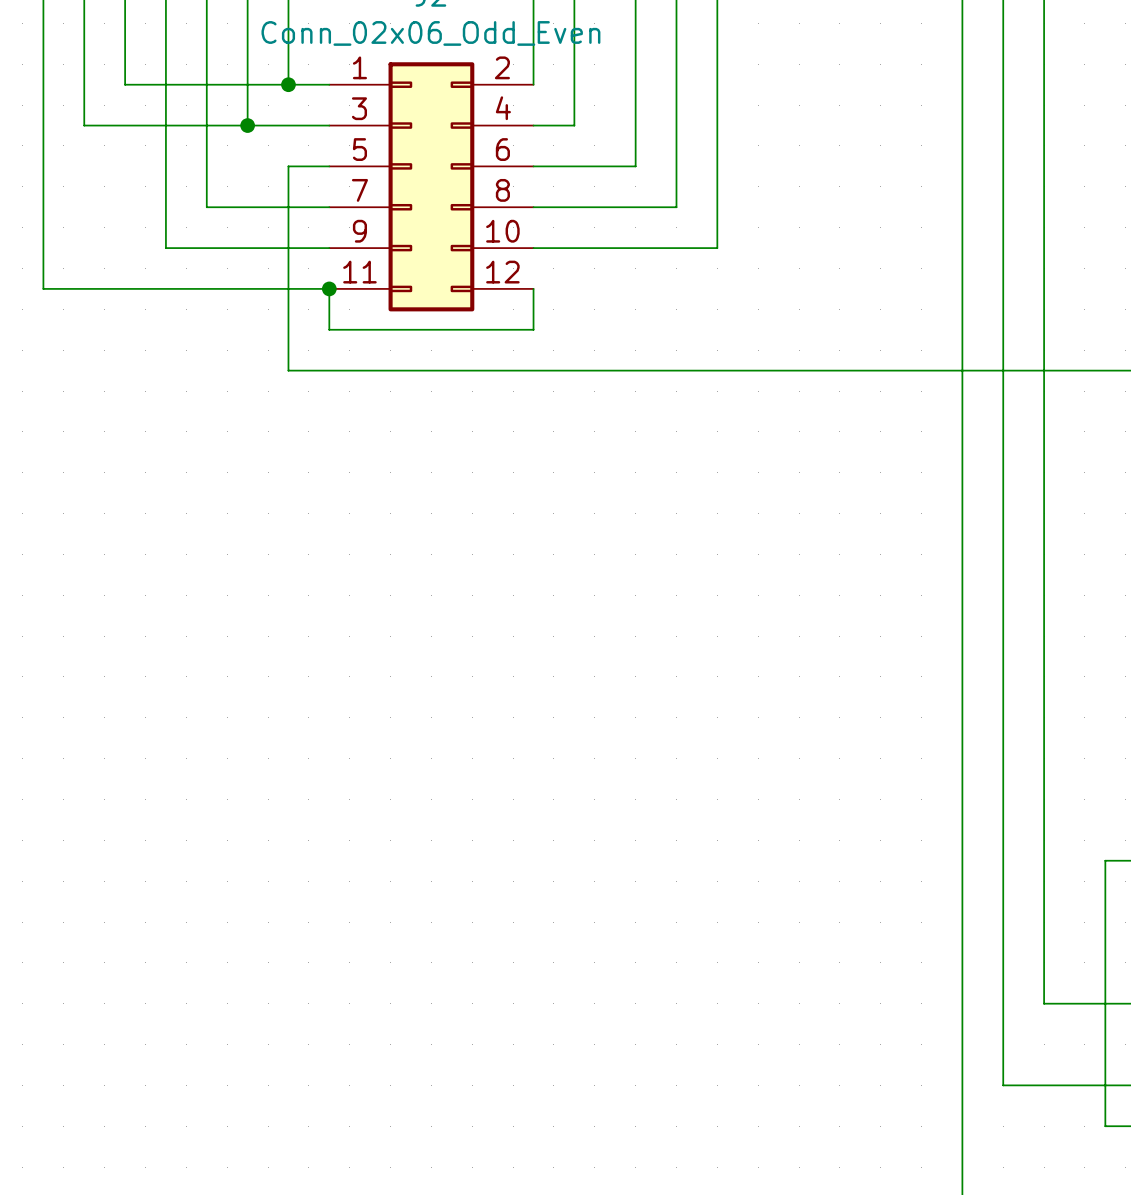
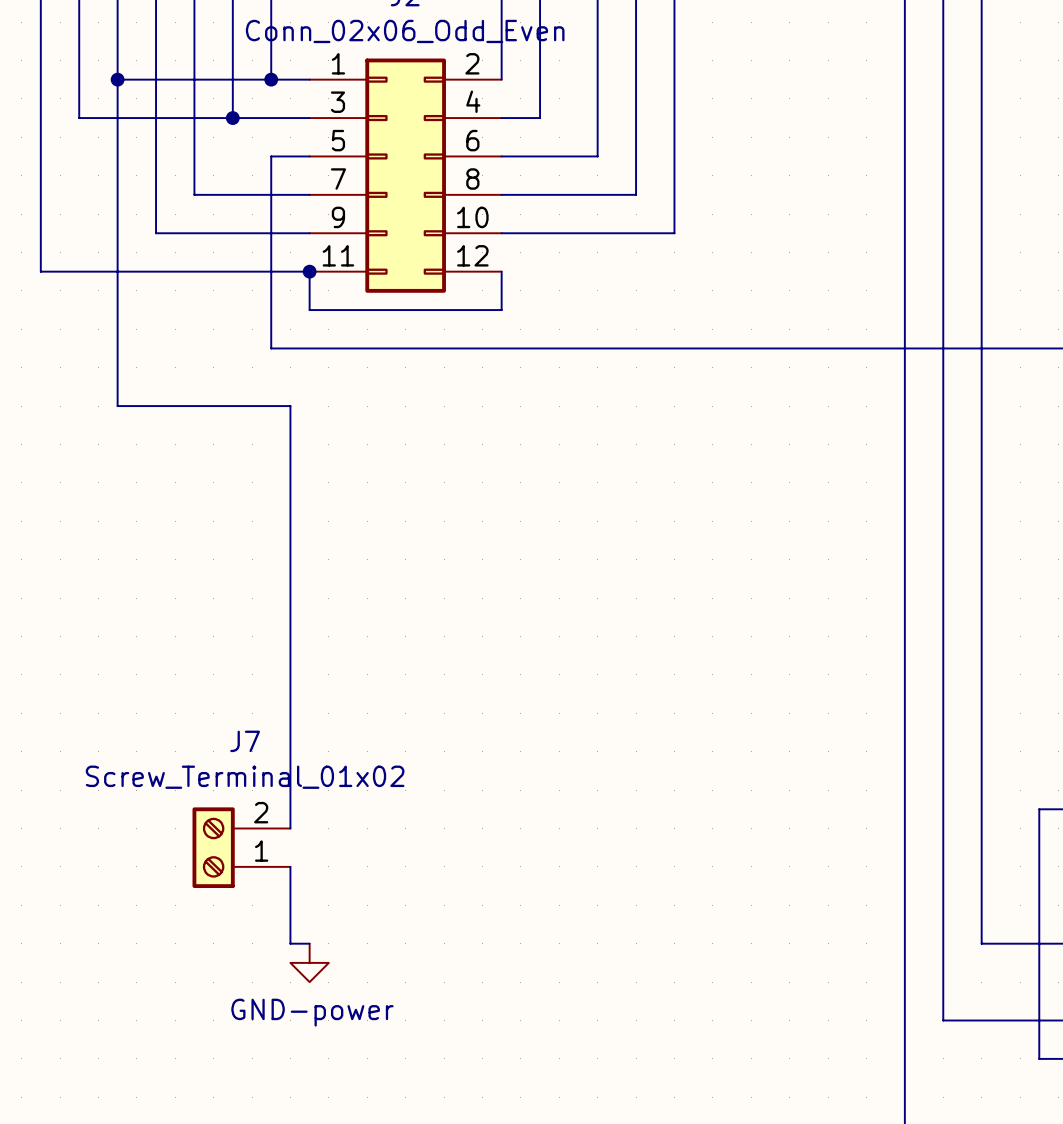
wire: none -> (117, 79) (117, 406) (290, 406) (290, 828)
junction: none -> (117, 79)
J7: none -> Screw_Terminal_01x02 (241, 847)
wire: none -> (290, 866) (290, 943) (309, 943)
power symbol: none -> GND-power (309, 962)

